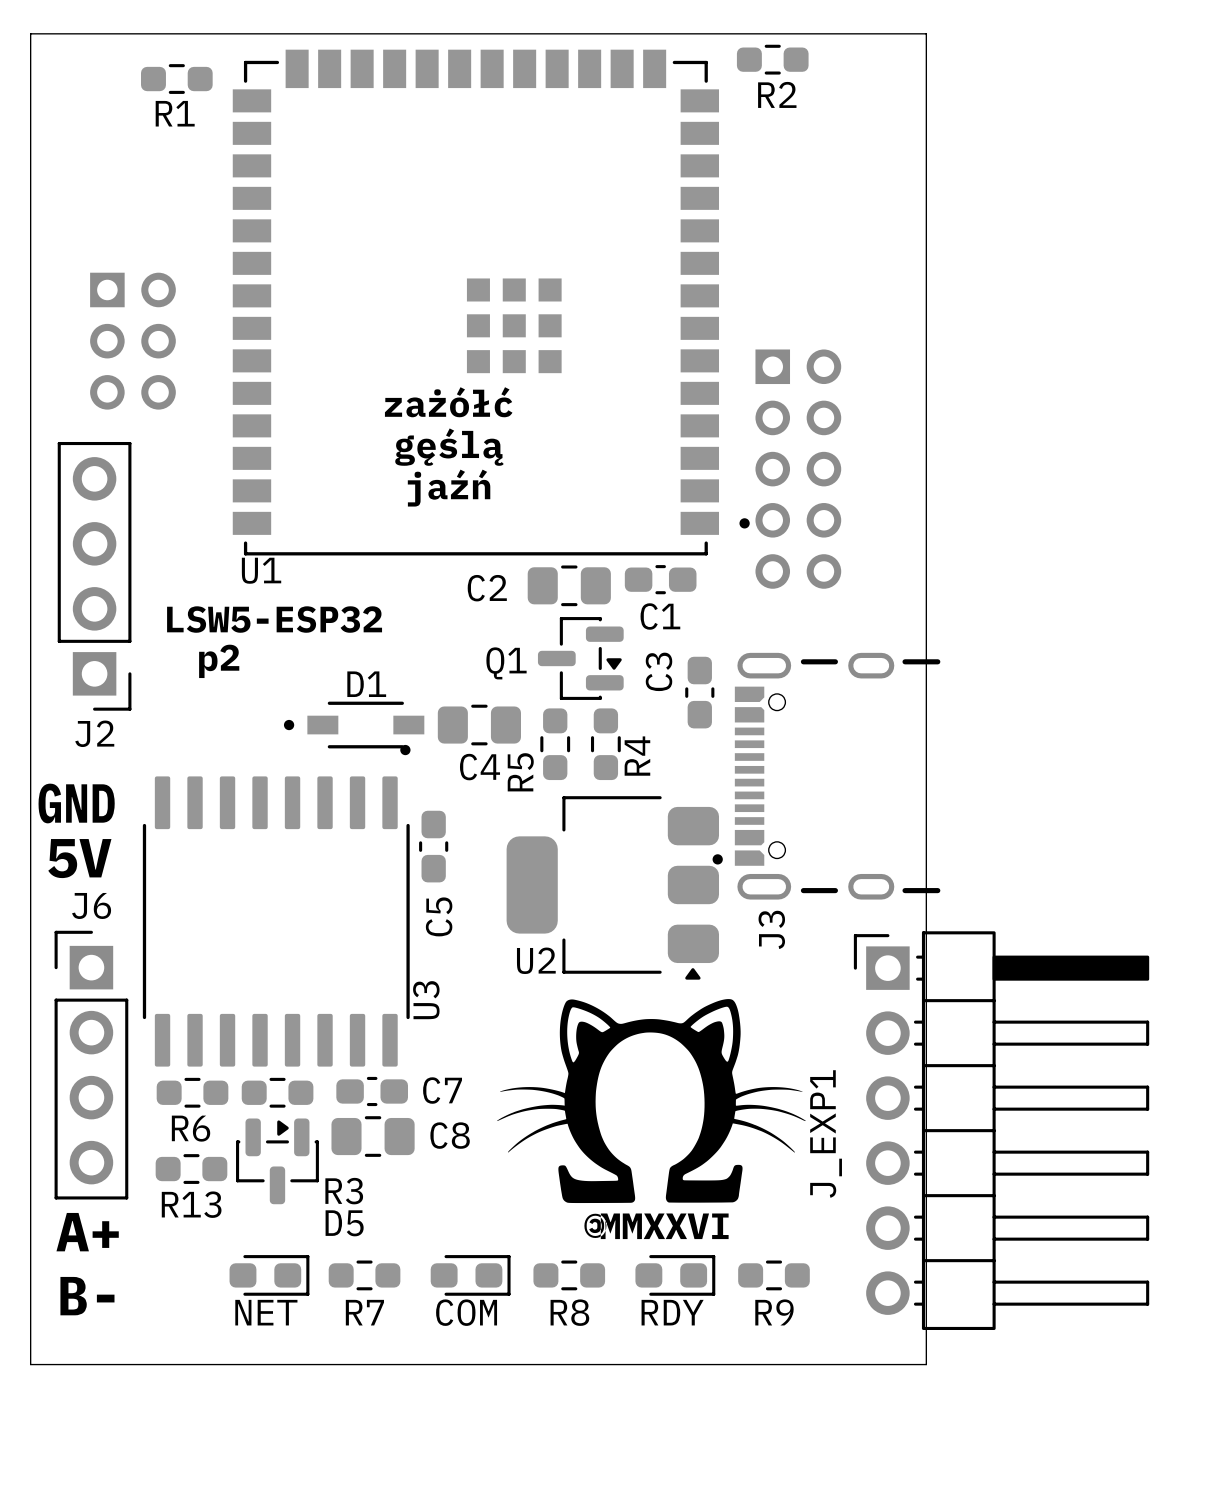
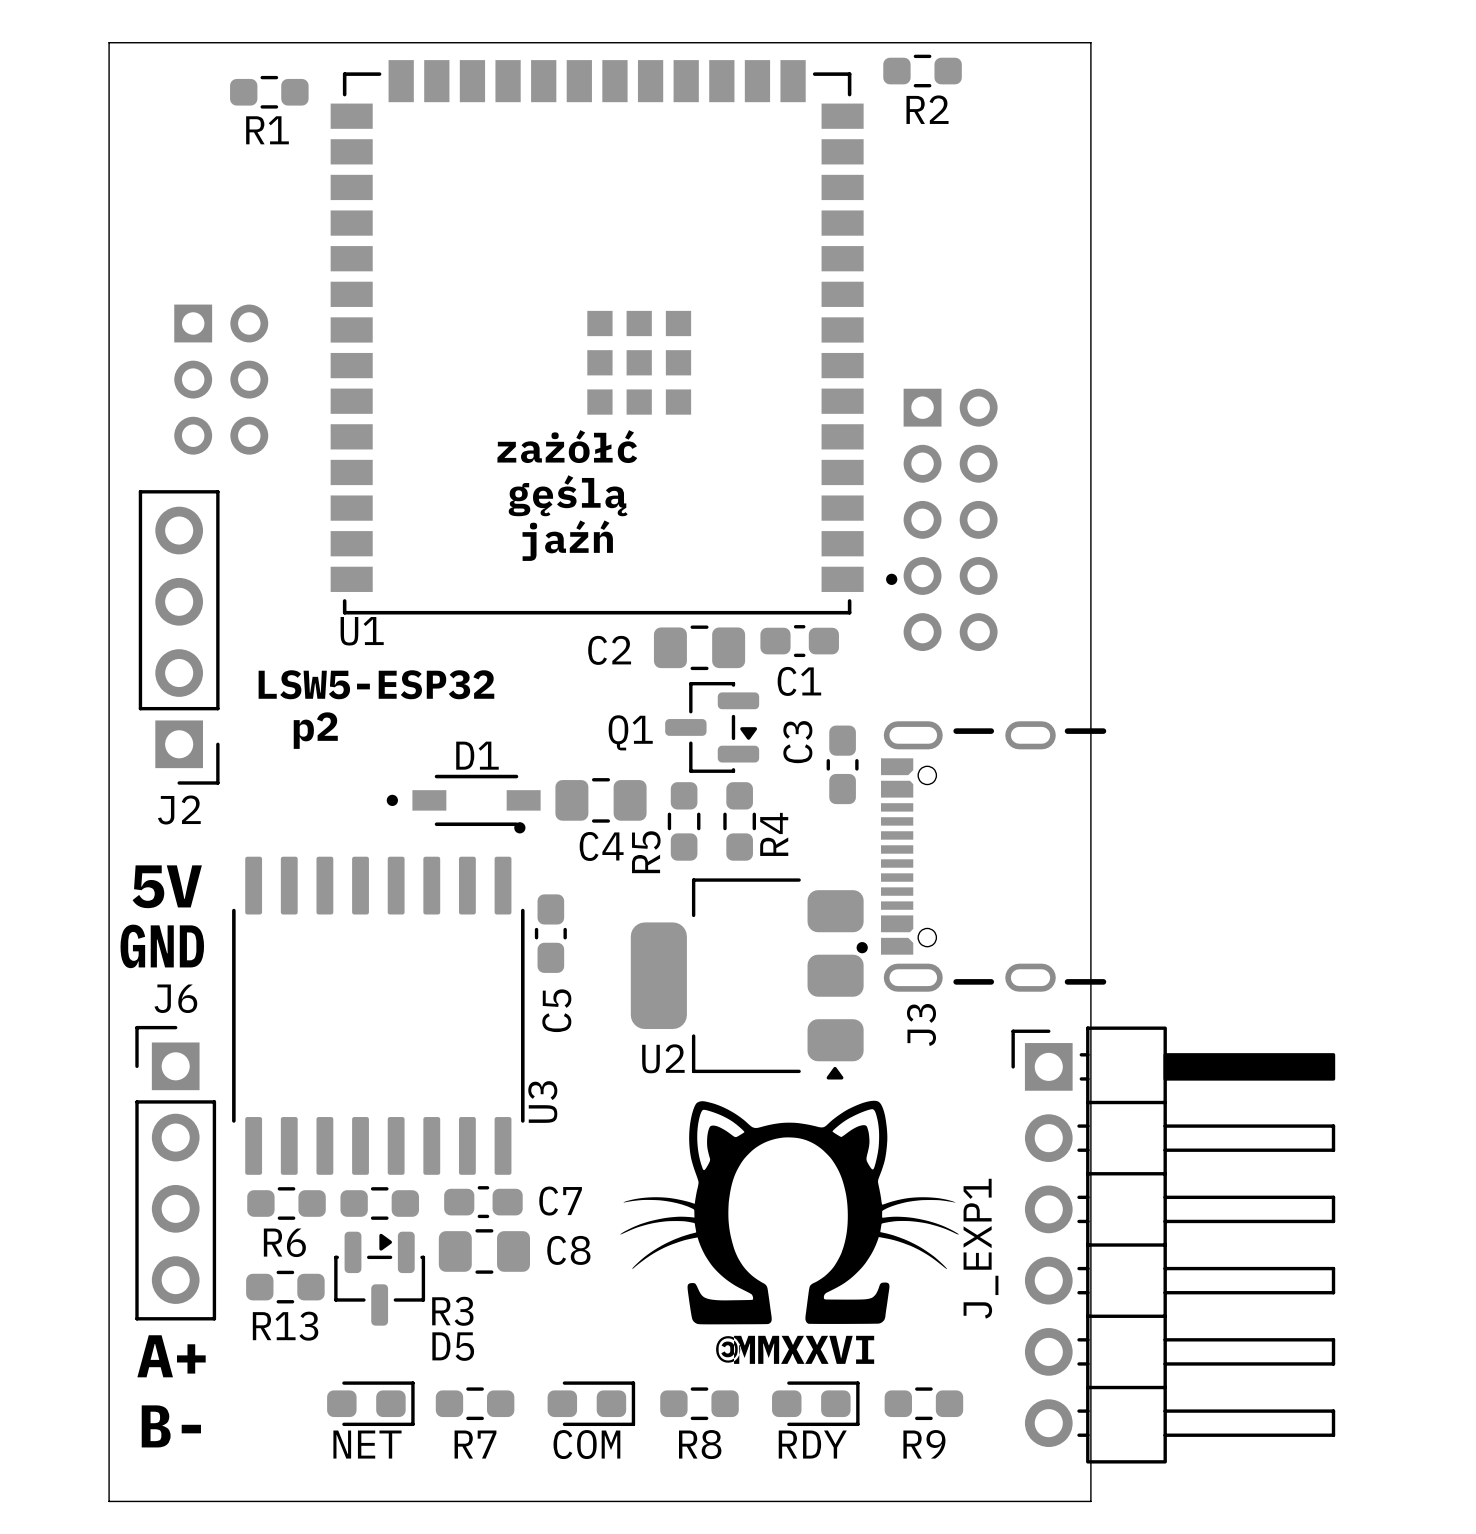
text position: GND (76, 803) -> GND (162, 946)
text position: 5V (79, 858) -> 5V (167, 886)

